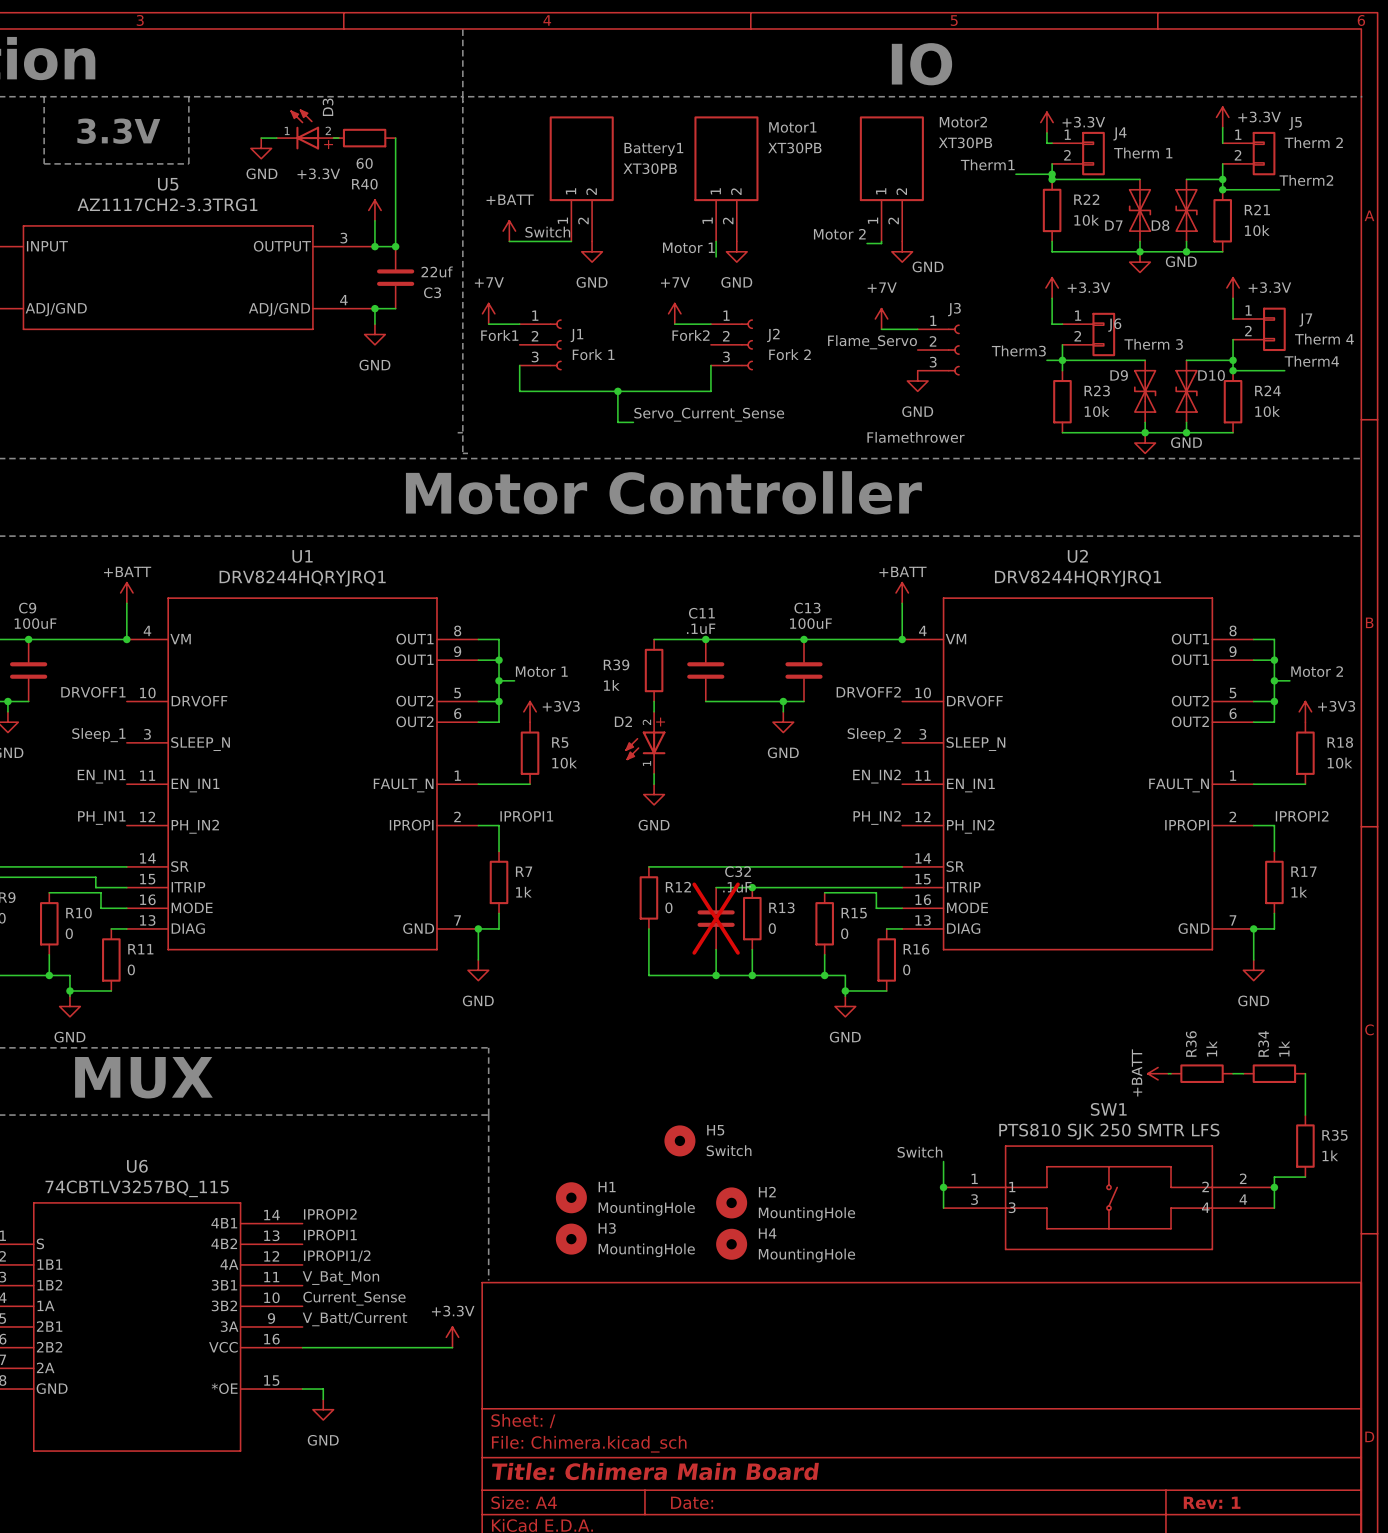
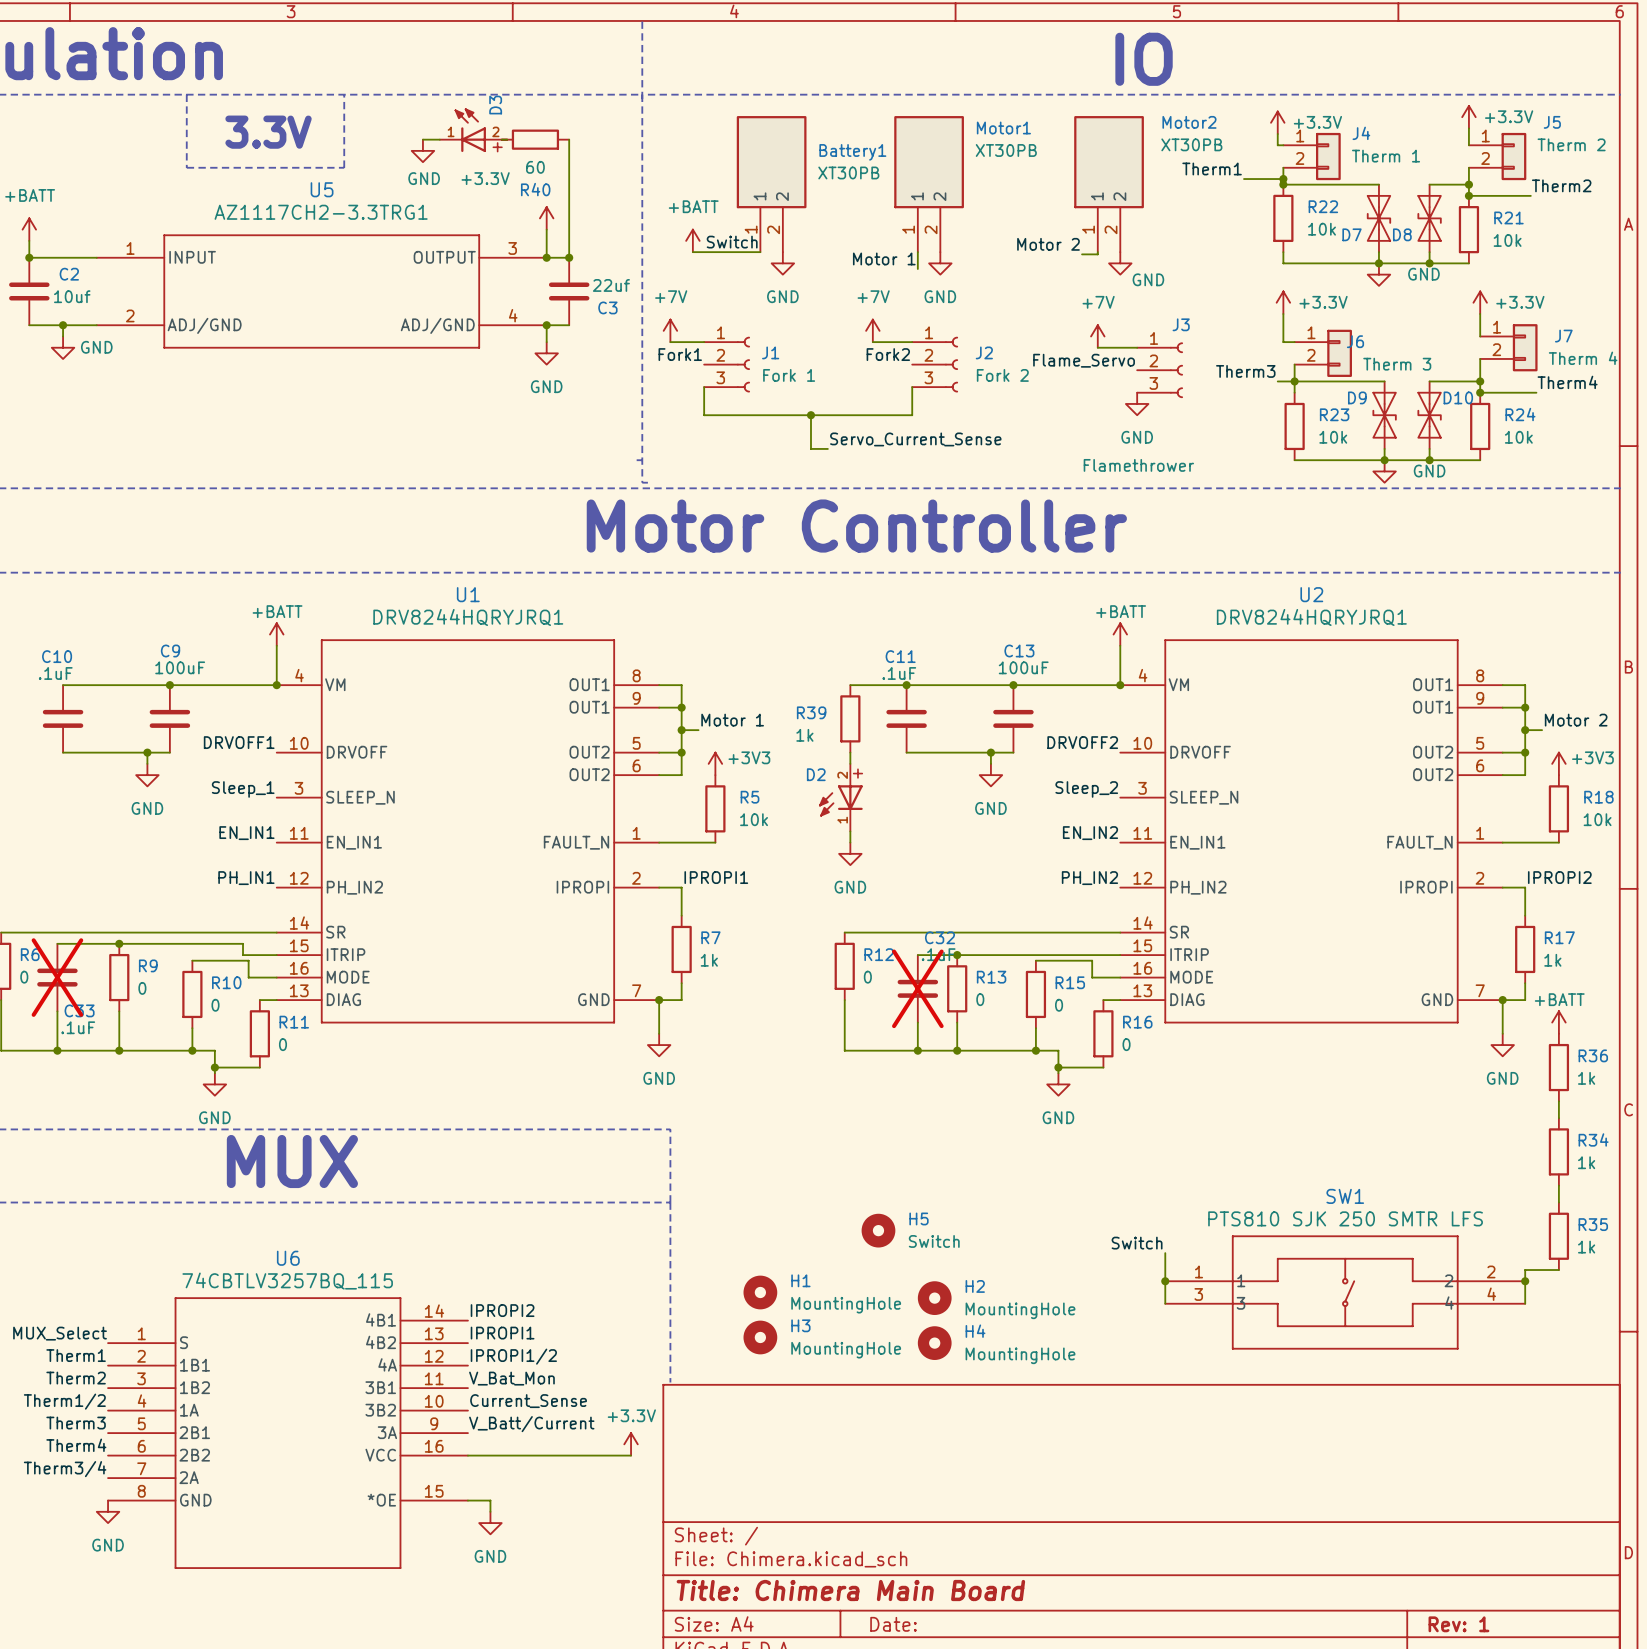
wire: none -> (1558, 1101) (1558, 1118)
power symbol rotation: 0° (1158, 1073) -> 90° clockwise (1558, 1022)
power symbol position: +BATT (1158, 1073) -> +BATT (1558, 1022)
wire: (1168, 1073) (1171, 1073) -> none
R36 rotation: 0° (1202, 1073) -> 90° clockwise (1558, 1067)
R36 position: (1202, 1073) -> (1558, 1067)
wire: (1233, 1073) (1243, 1073) -> none
R34 rotation: 0° (1274, 1073) -> 90° clockwise (1558, 1151)
wire: (1305, 1073) (1305, 1099) -> none

